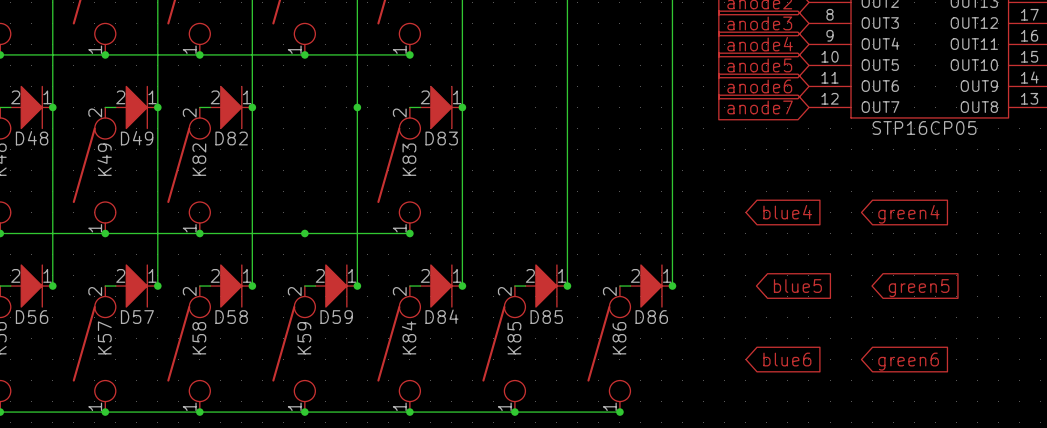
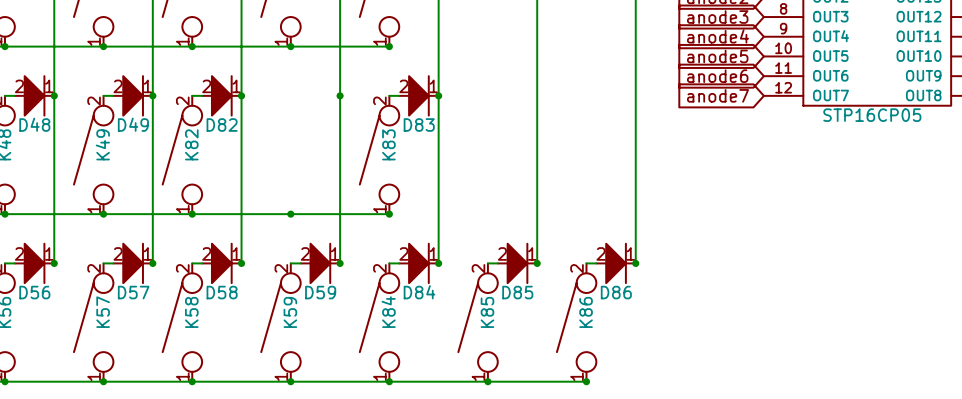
global label: blue4 (787, 212) -> none
global label: green4 (908, 214) -> none
global label: blue5 (797, 286) -> none
global label: green5 (919, 288) -> none
global label: blue6 (787, 359) -> none
global label: green6 (908, 361) -> none

